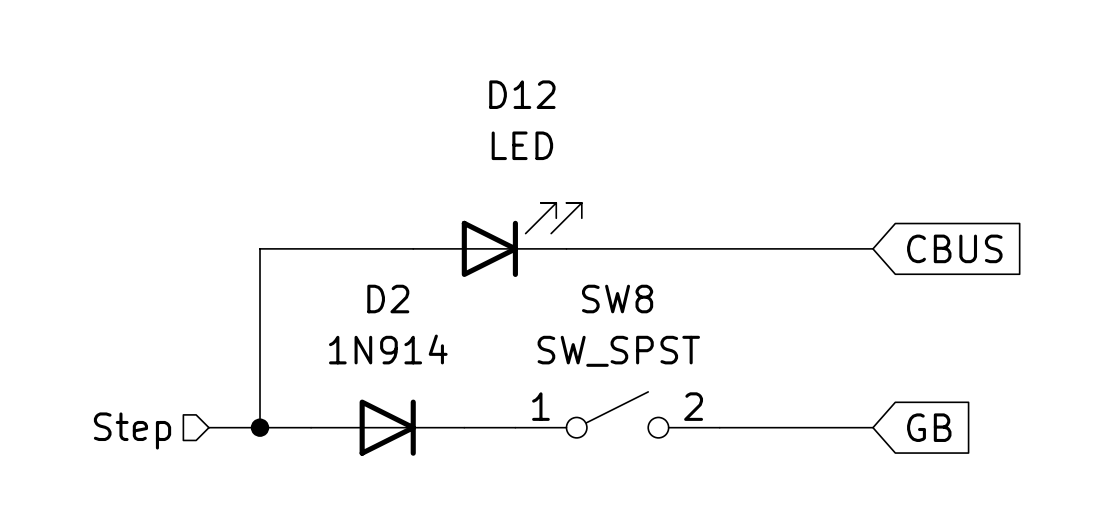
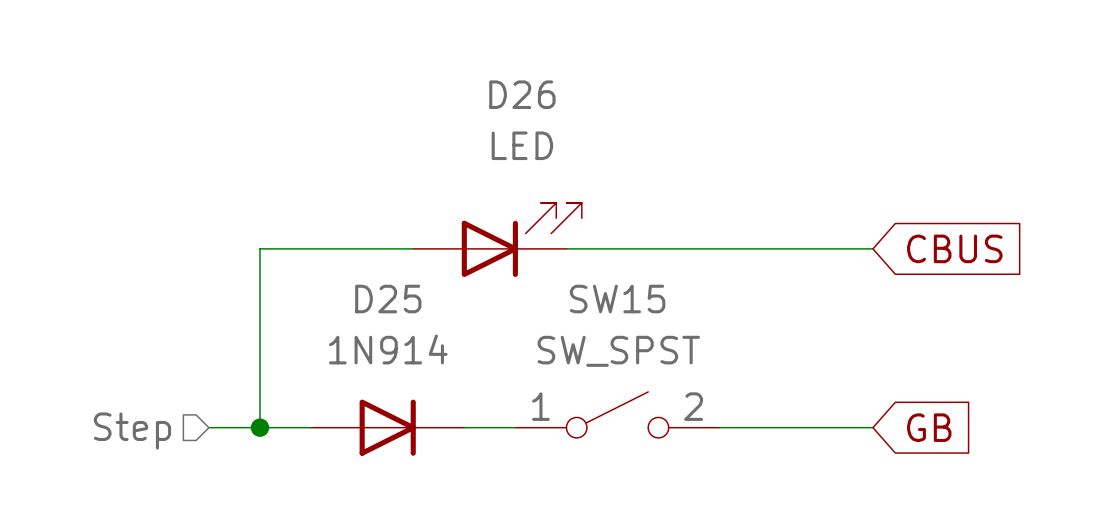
D12 name: D12 (522, 94) -> D26 (522, 94)
D2 name: D2 (388, 299) -> D25 (388, 299)
SW8 name: SW8 (617, 299) -> SW15 (617, 299)

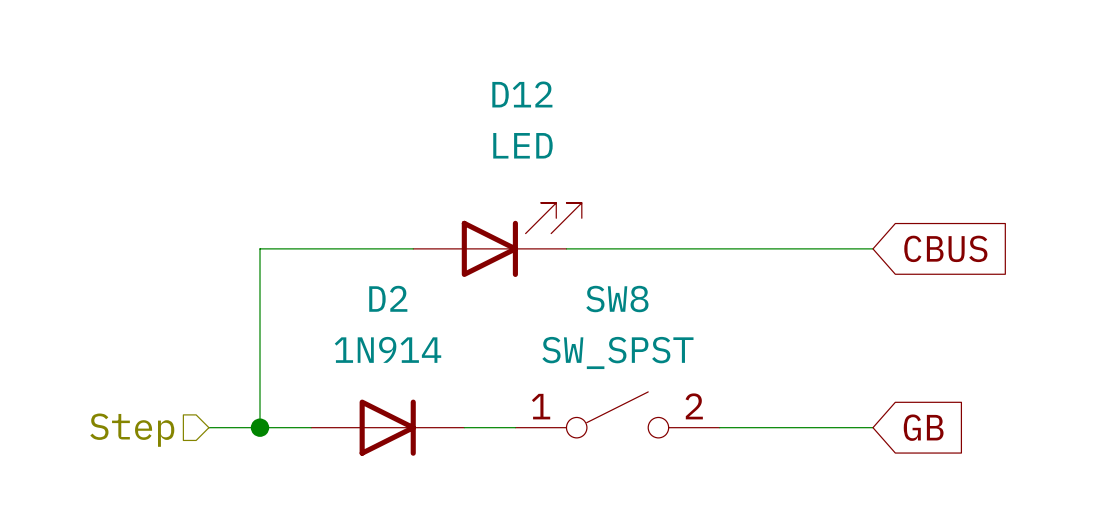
D26 name: D26 (522, 94) -> D12 (522, 94)
D25 name: D25 (388, 299) -> D2 (388, 298)
SW15 name: SW15 (617, 299) -> SW8 (617, 299)

